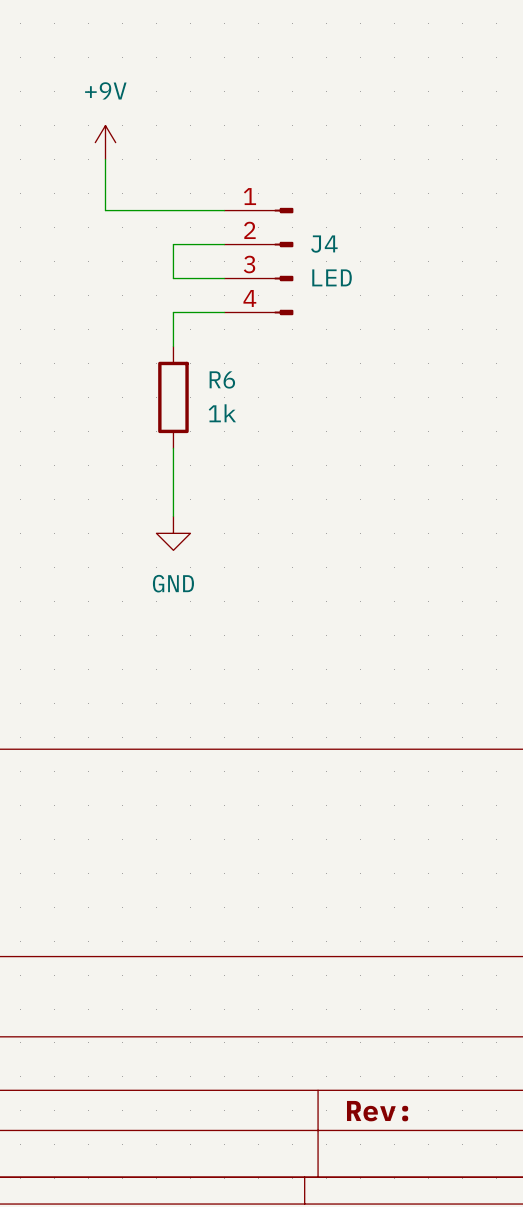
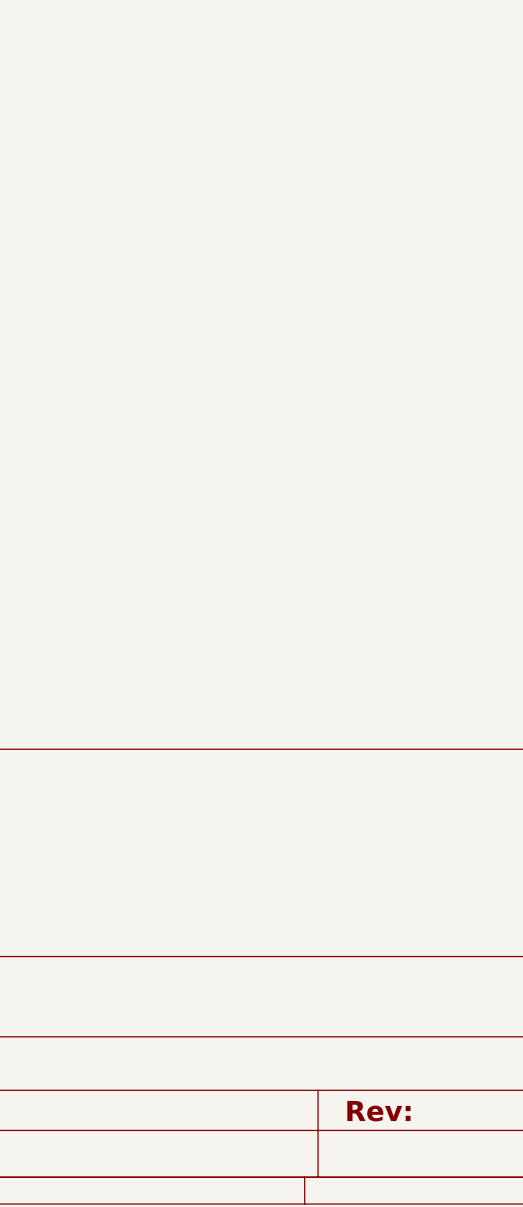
power symbol: +9V (105, 142) -> none
wire: (105, 159) (105, 210) (224, 210) -> none
wire: (224, 244) (173, 244) (173, 278) (224, 278) -> none
J4: LED (258, 261) -> none
wire: (224, 312) (173, 312) (173, 346) -> none
R6: 1k (173, 397) -> none
wire: (173, 448) (173, 516) -> none
power symbol: GND (173, 533) -> none

